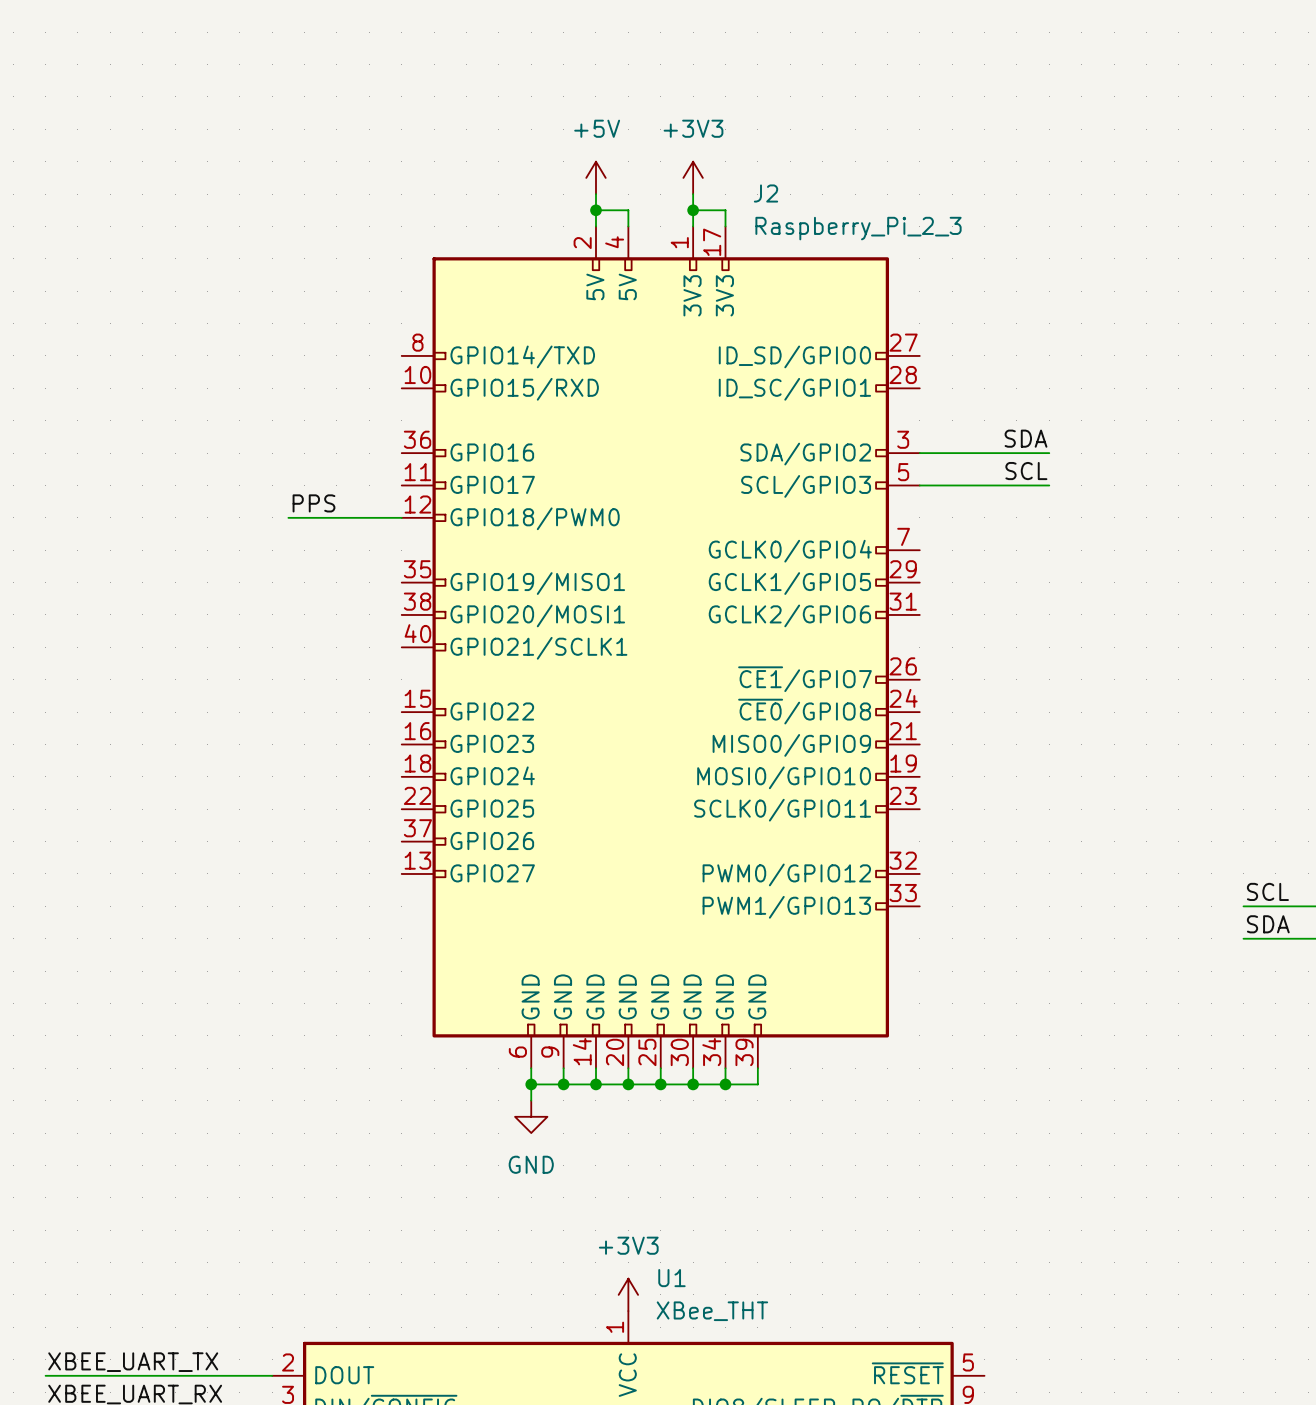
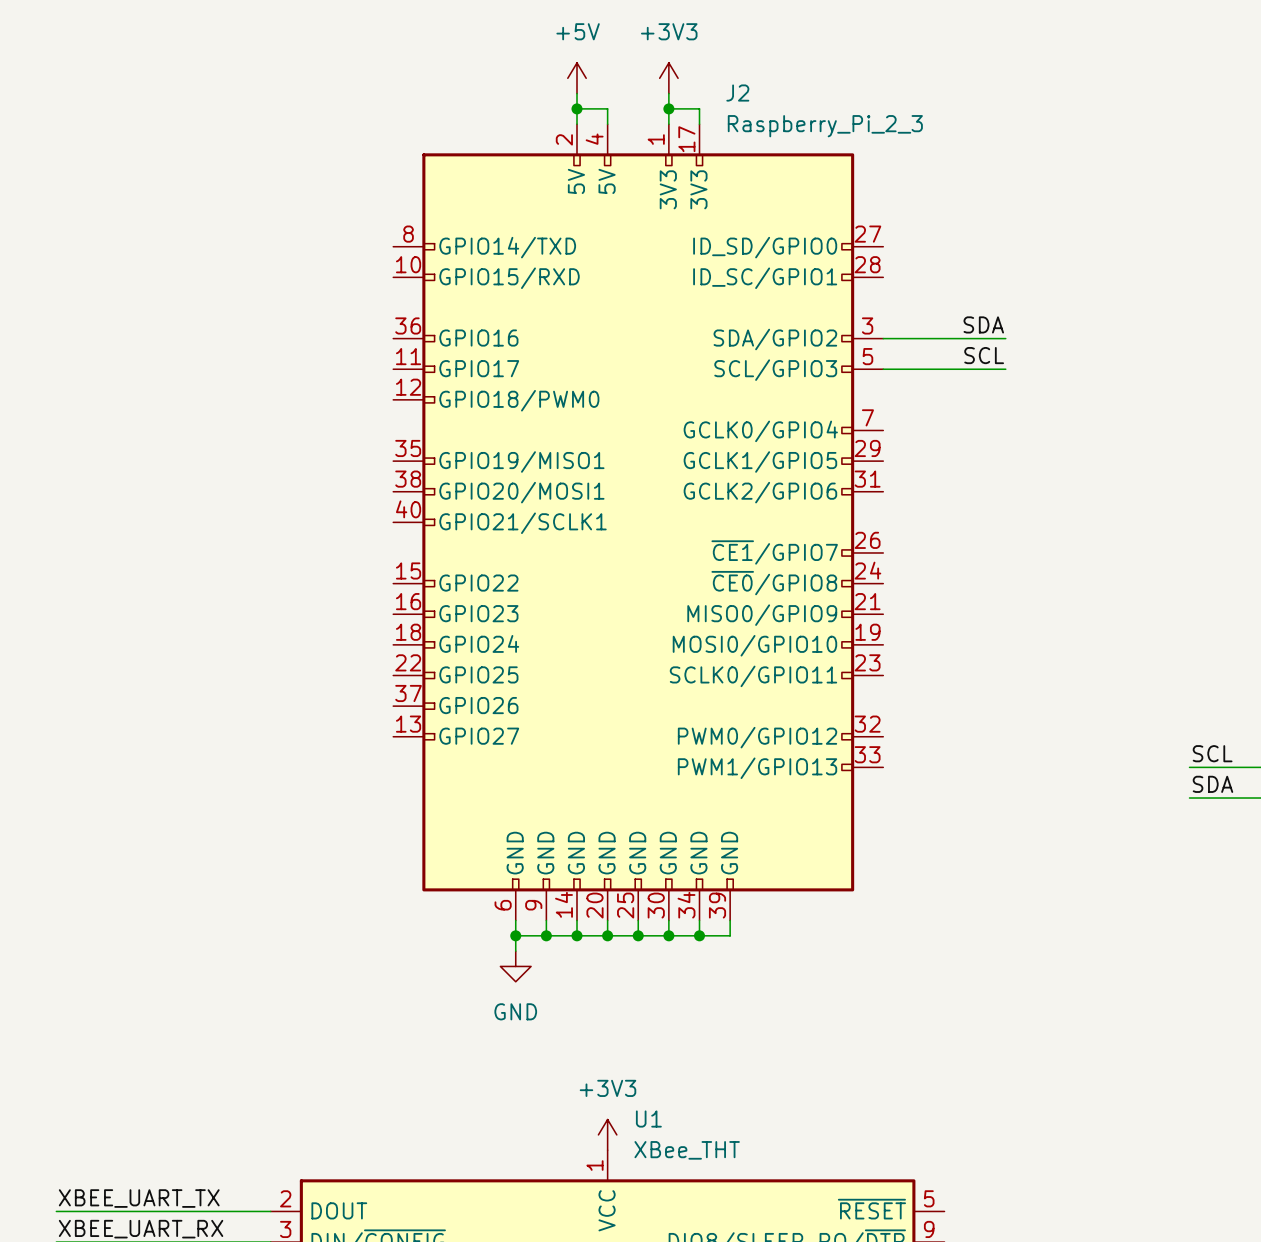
label: PPS (313, 503) -> none
wire: (288, 517) (401, 517) -> none

